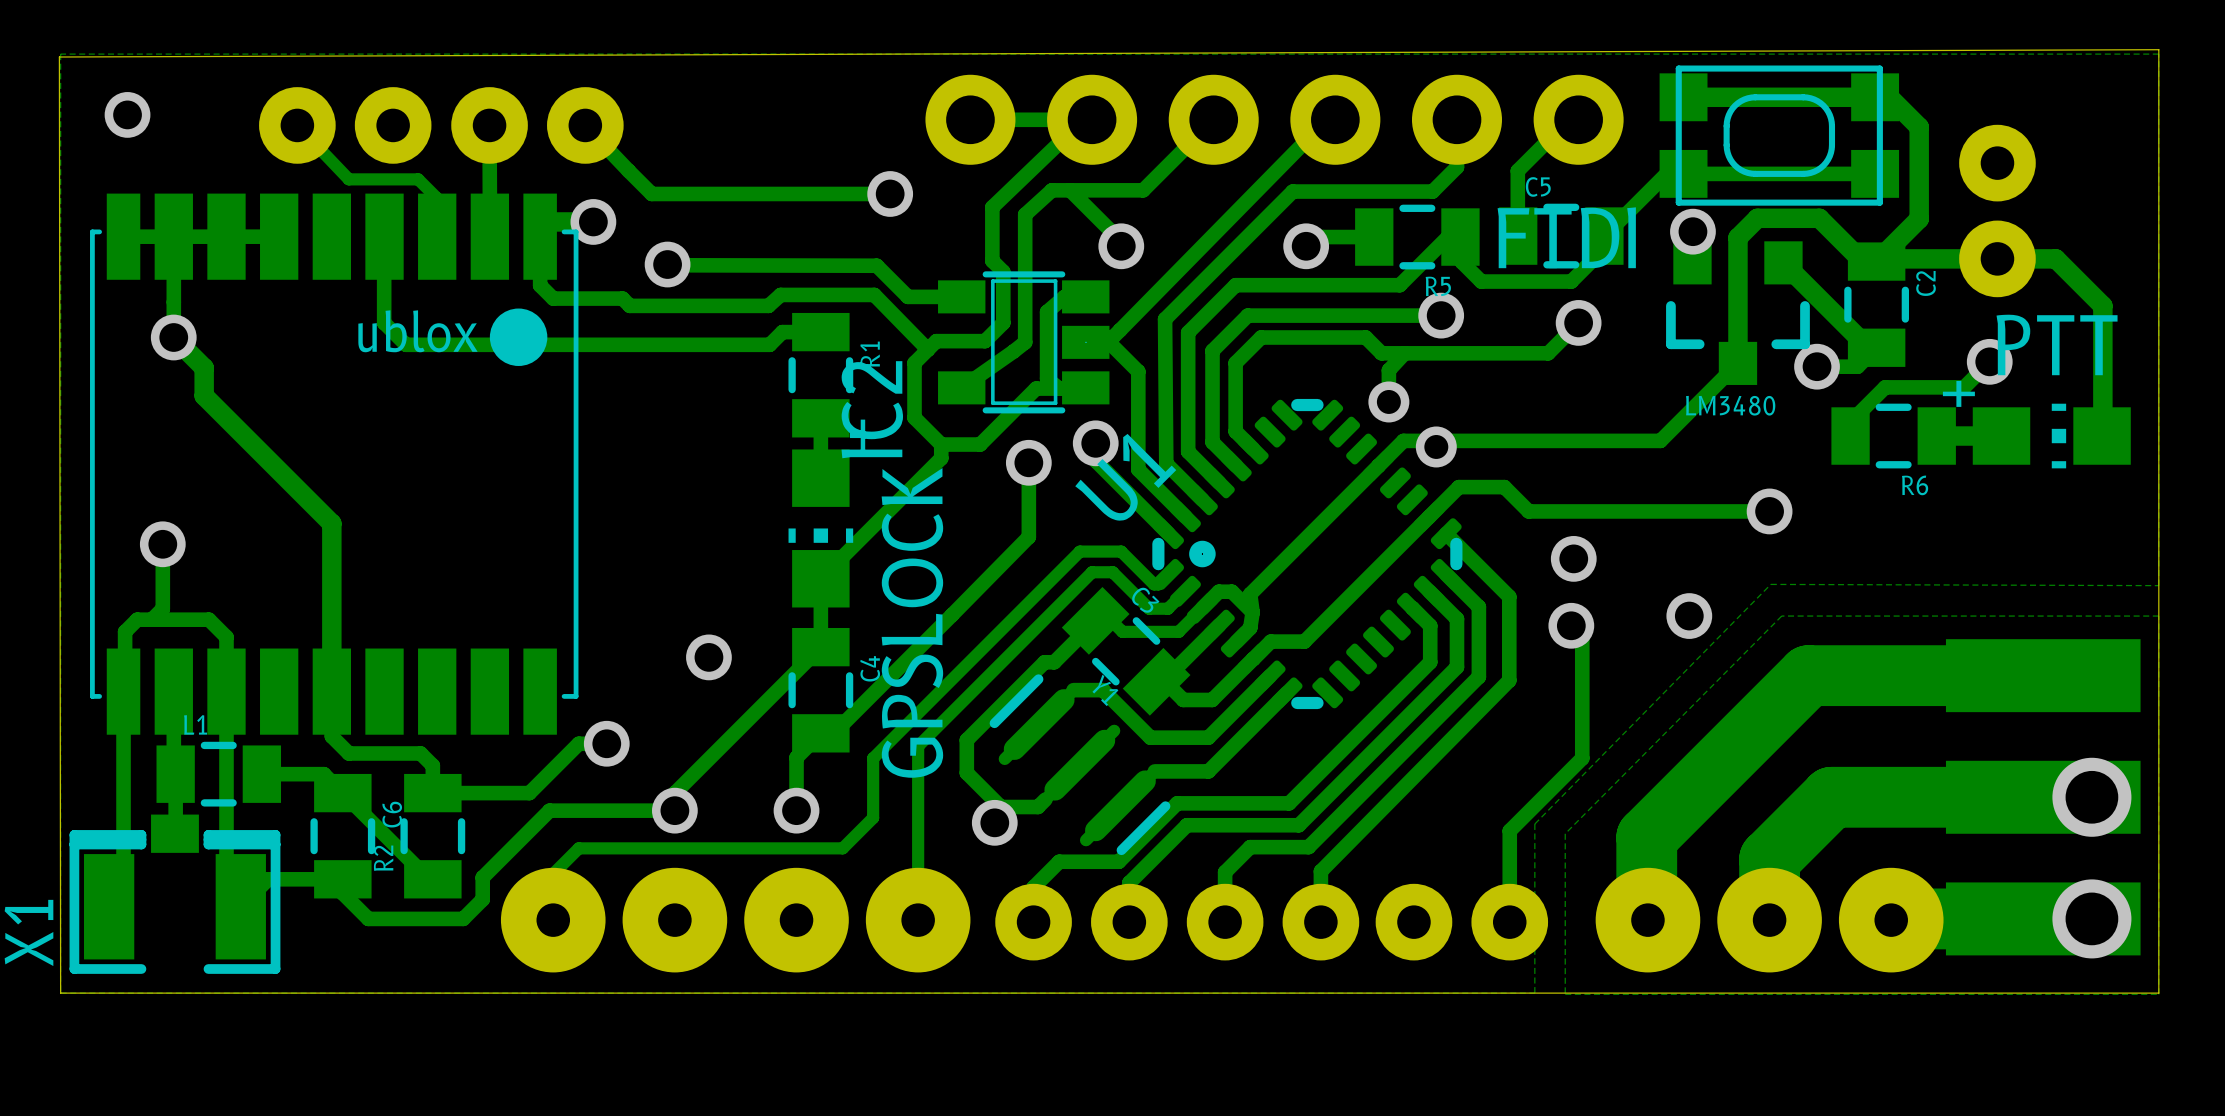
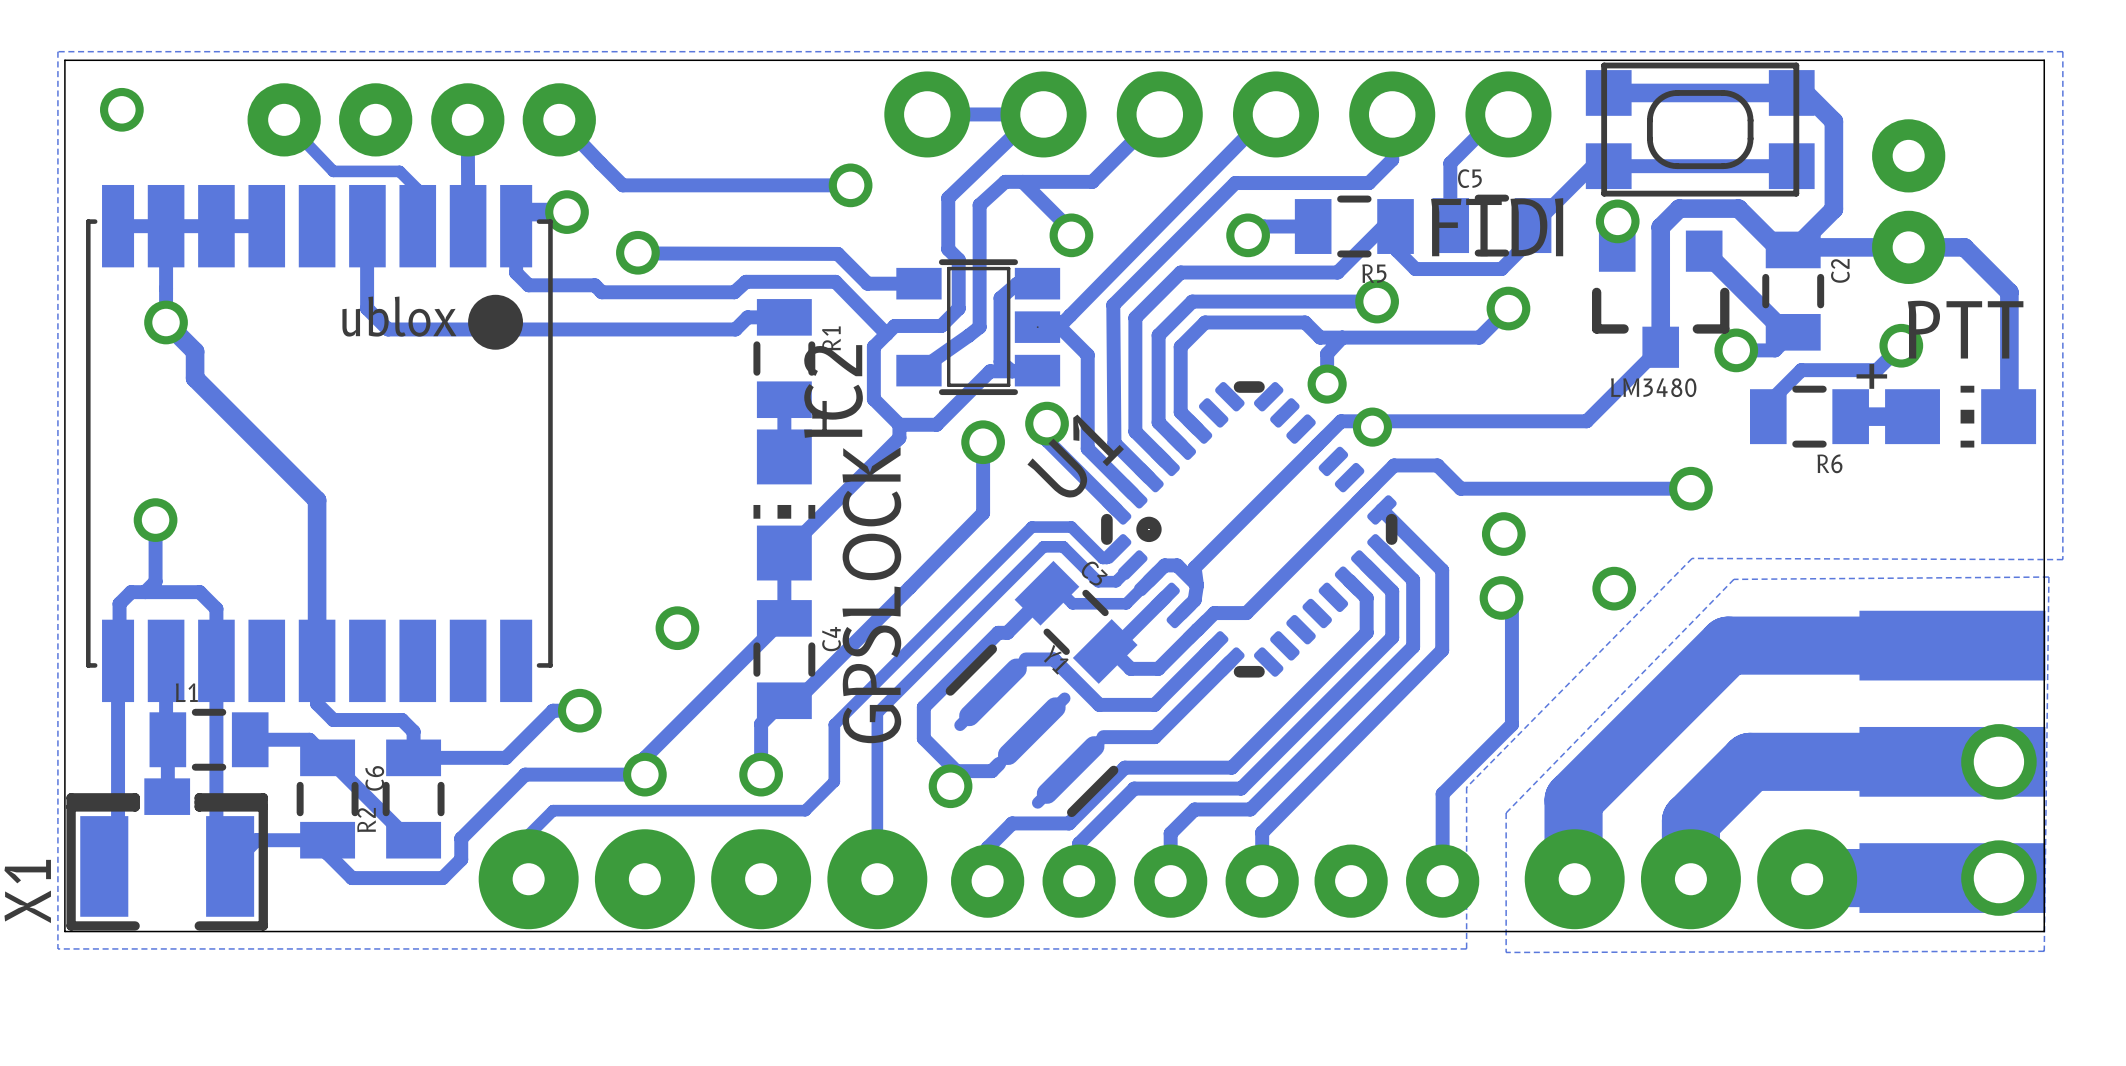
board edge: (2158, 49) (59, 57) (60, 993) (2158, 993) (2158, 49) -> (2044, 60) (2044, 931) (64, 931) (64, 60) (2044, 60)
zone outline: (2158, 616) (1781, 616) (1565, 833) (1565, 994) (2158, 994) (2158, 616) -> (2048, 577) (2044, 951) (1506, 952) (1506, 812) (1733, 579) (2048, 577)

